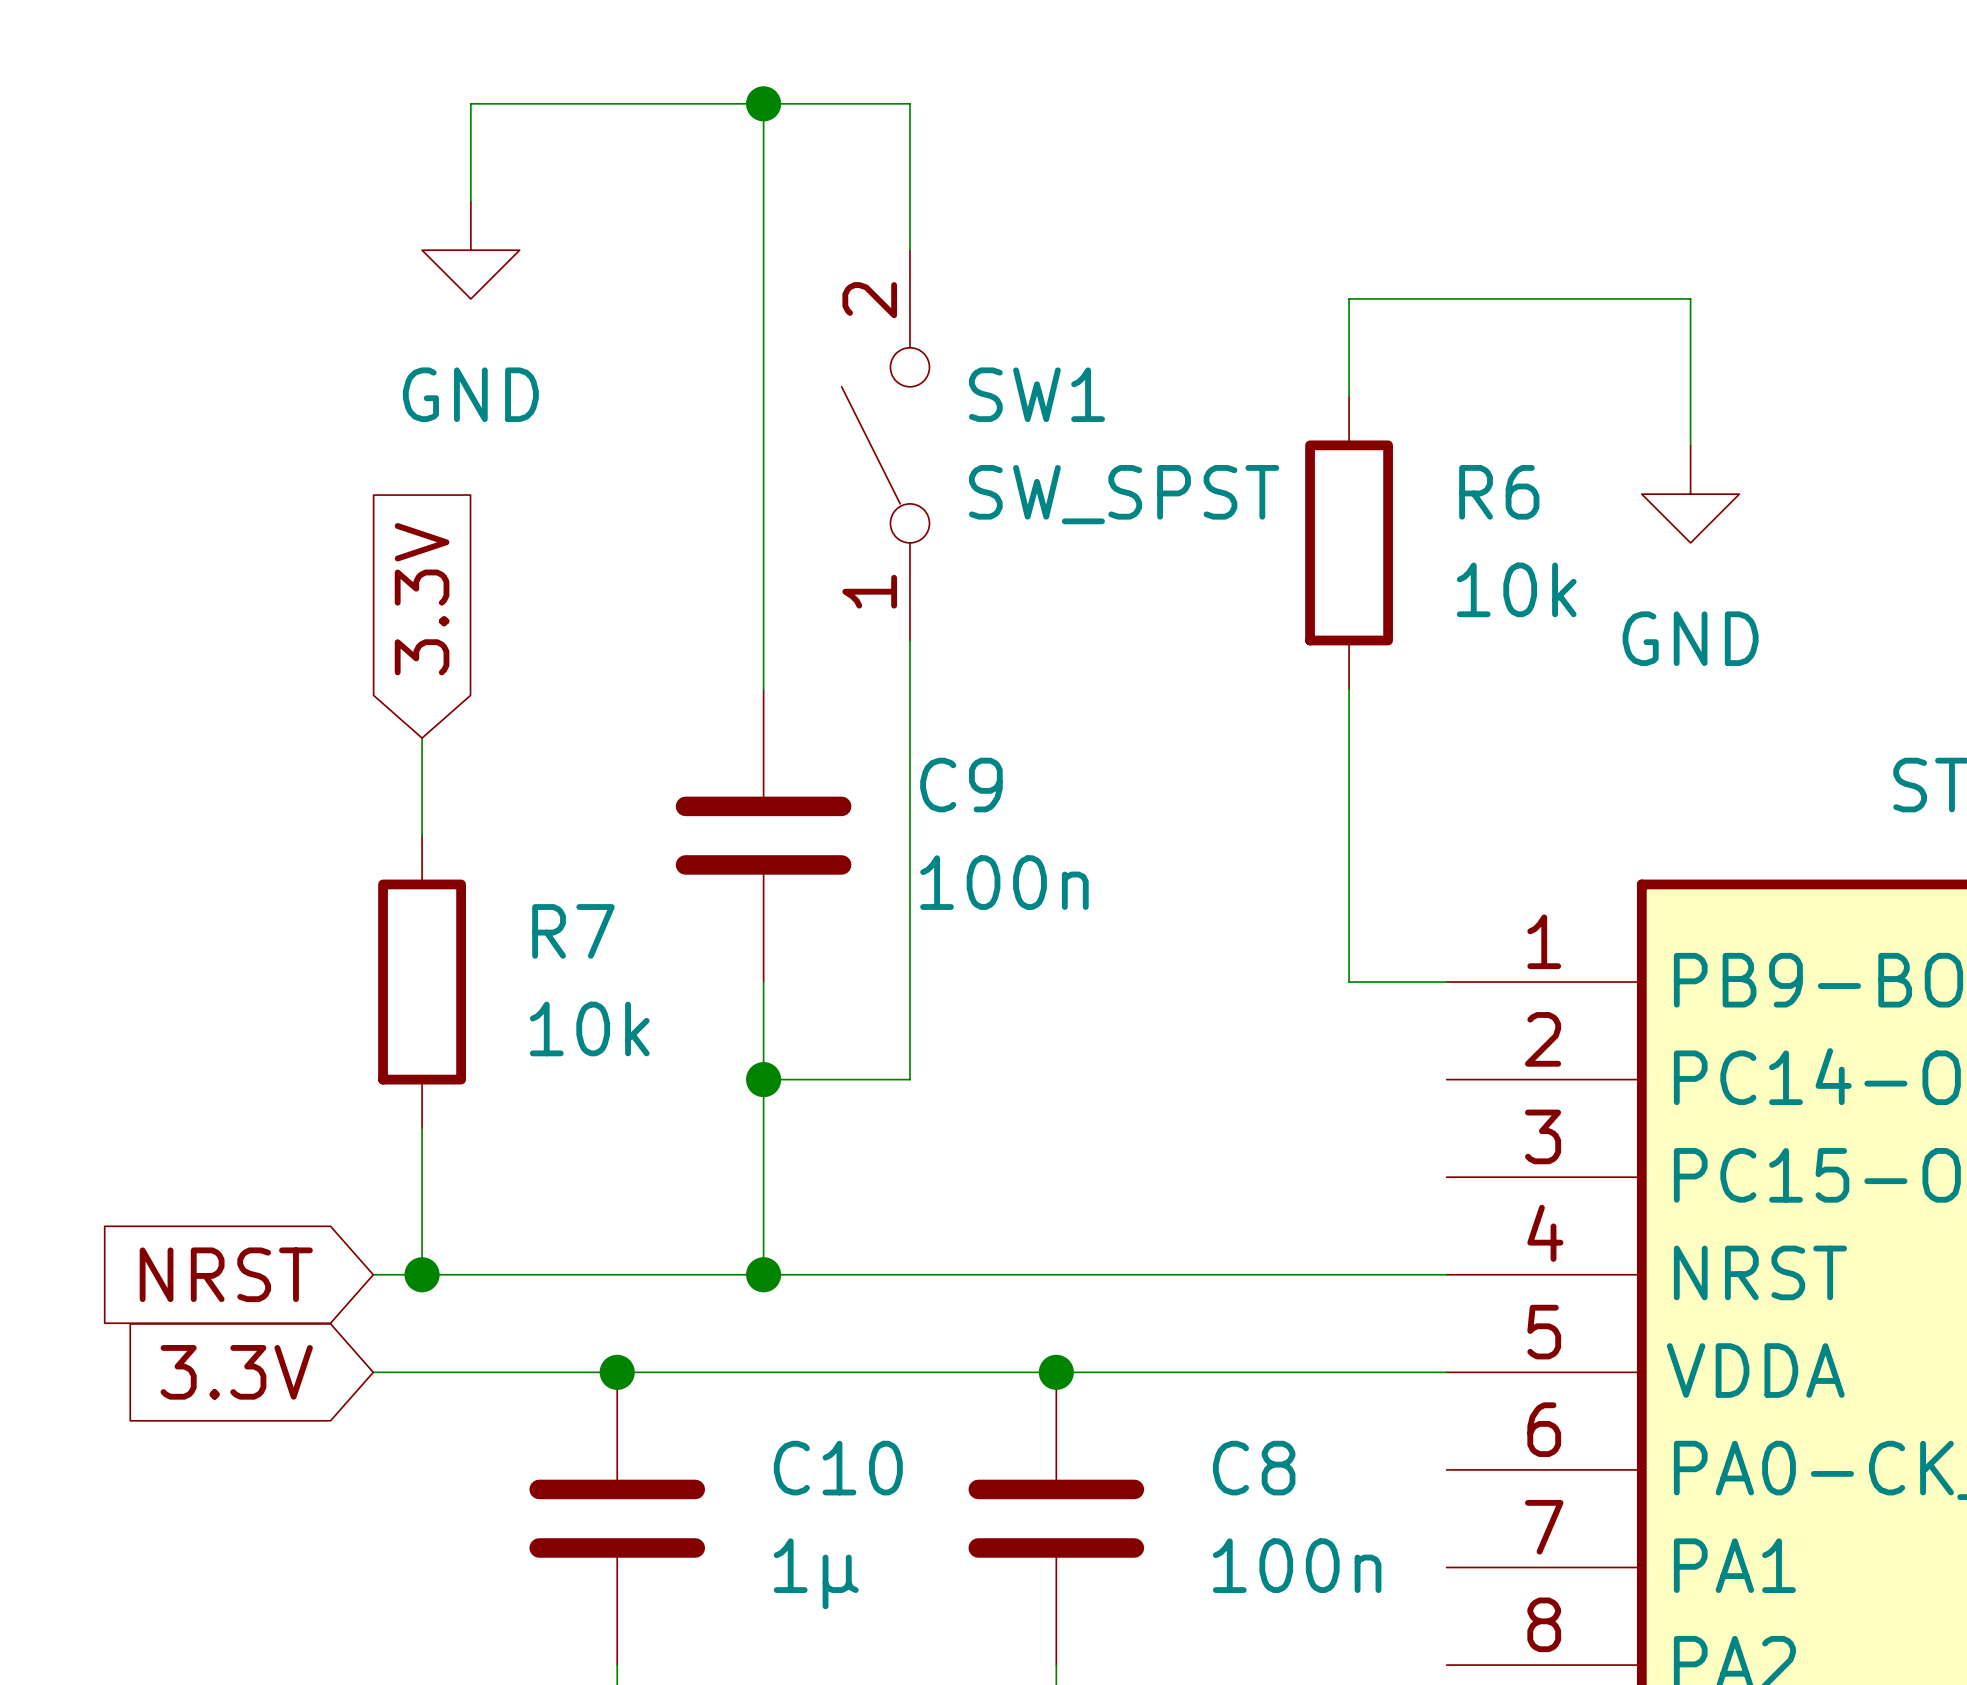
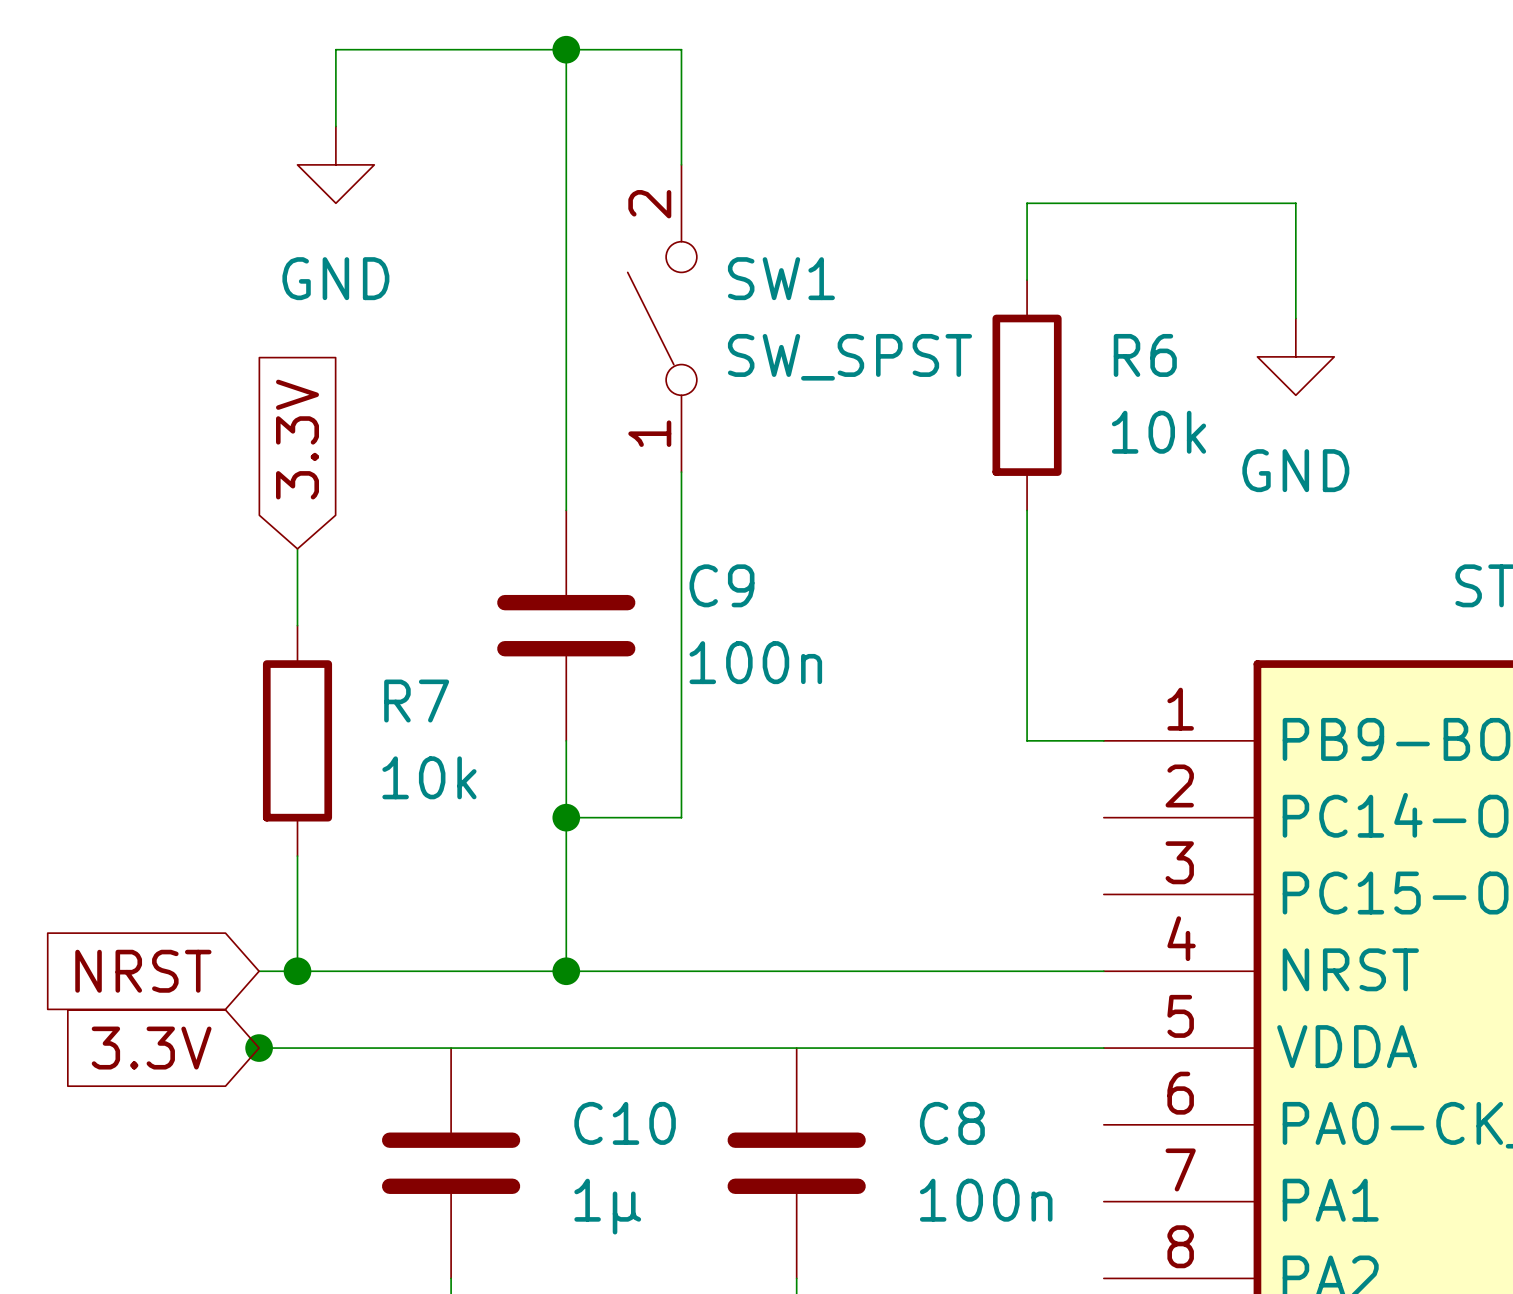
junction: none -> (259, 1048)
junction: (617, 1372) -> none
junction: (1056, 1372) -> none

